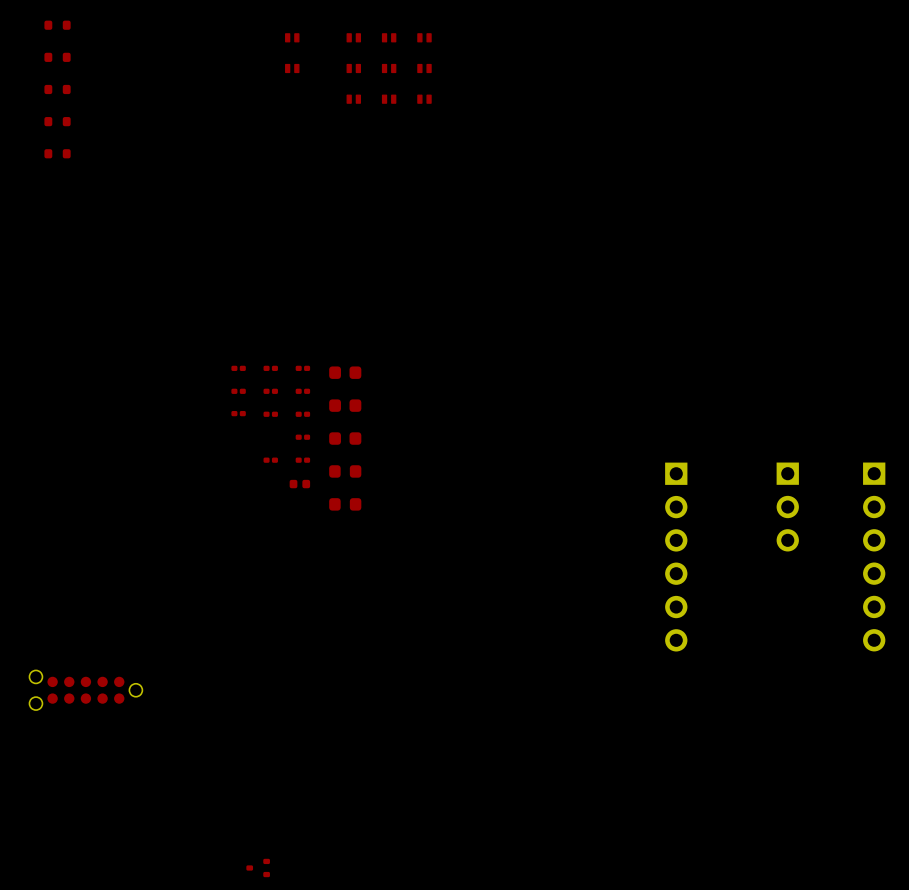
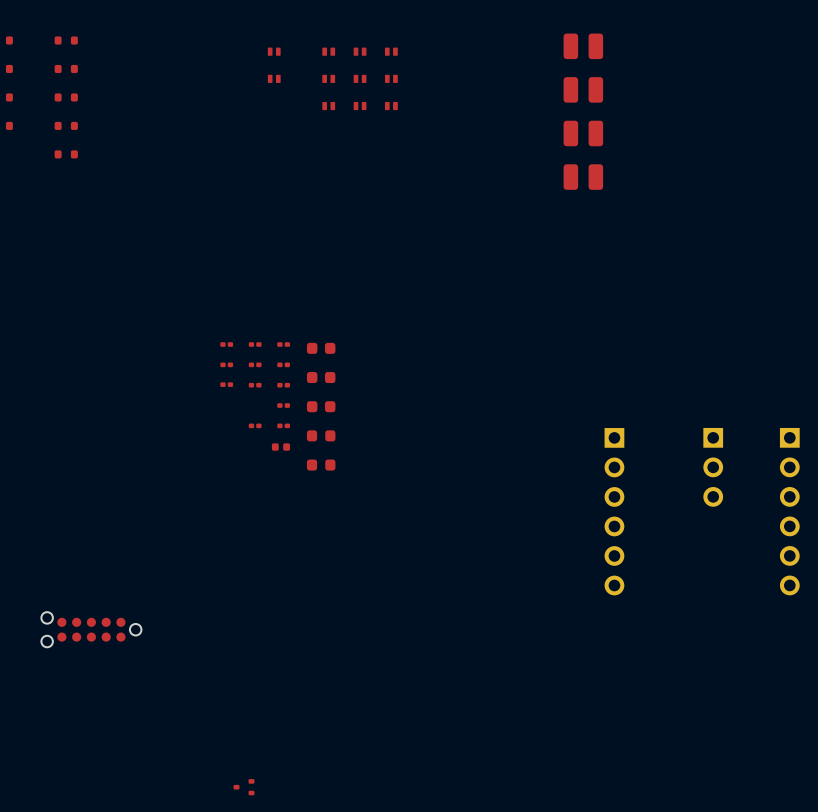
part: none -> (583, 46)
part: none -> (583, 89)
part: none -> (583, 133)
part: none -> (583, 177)

